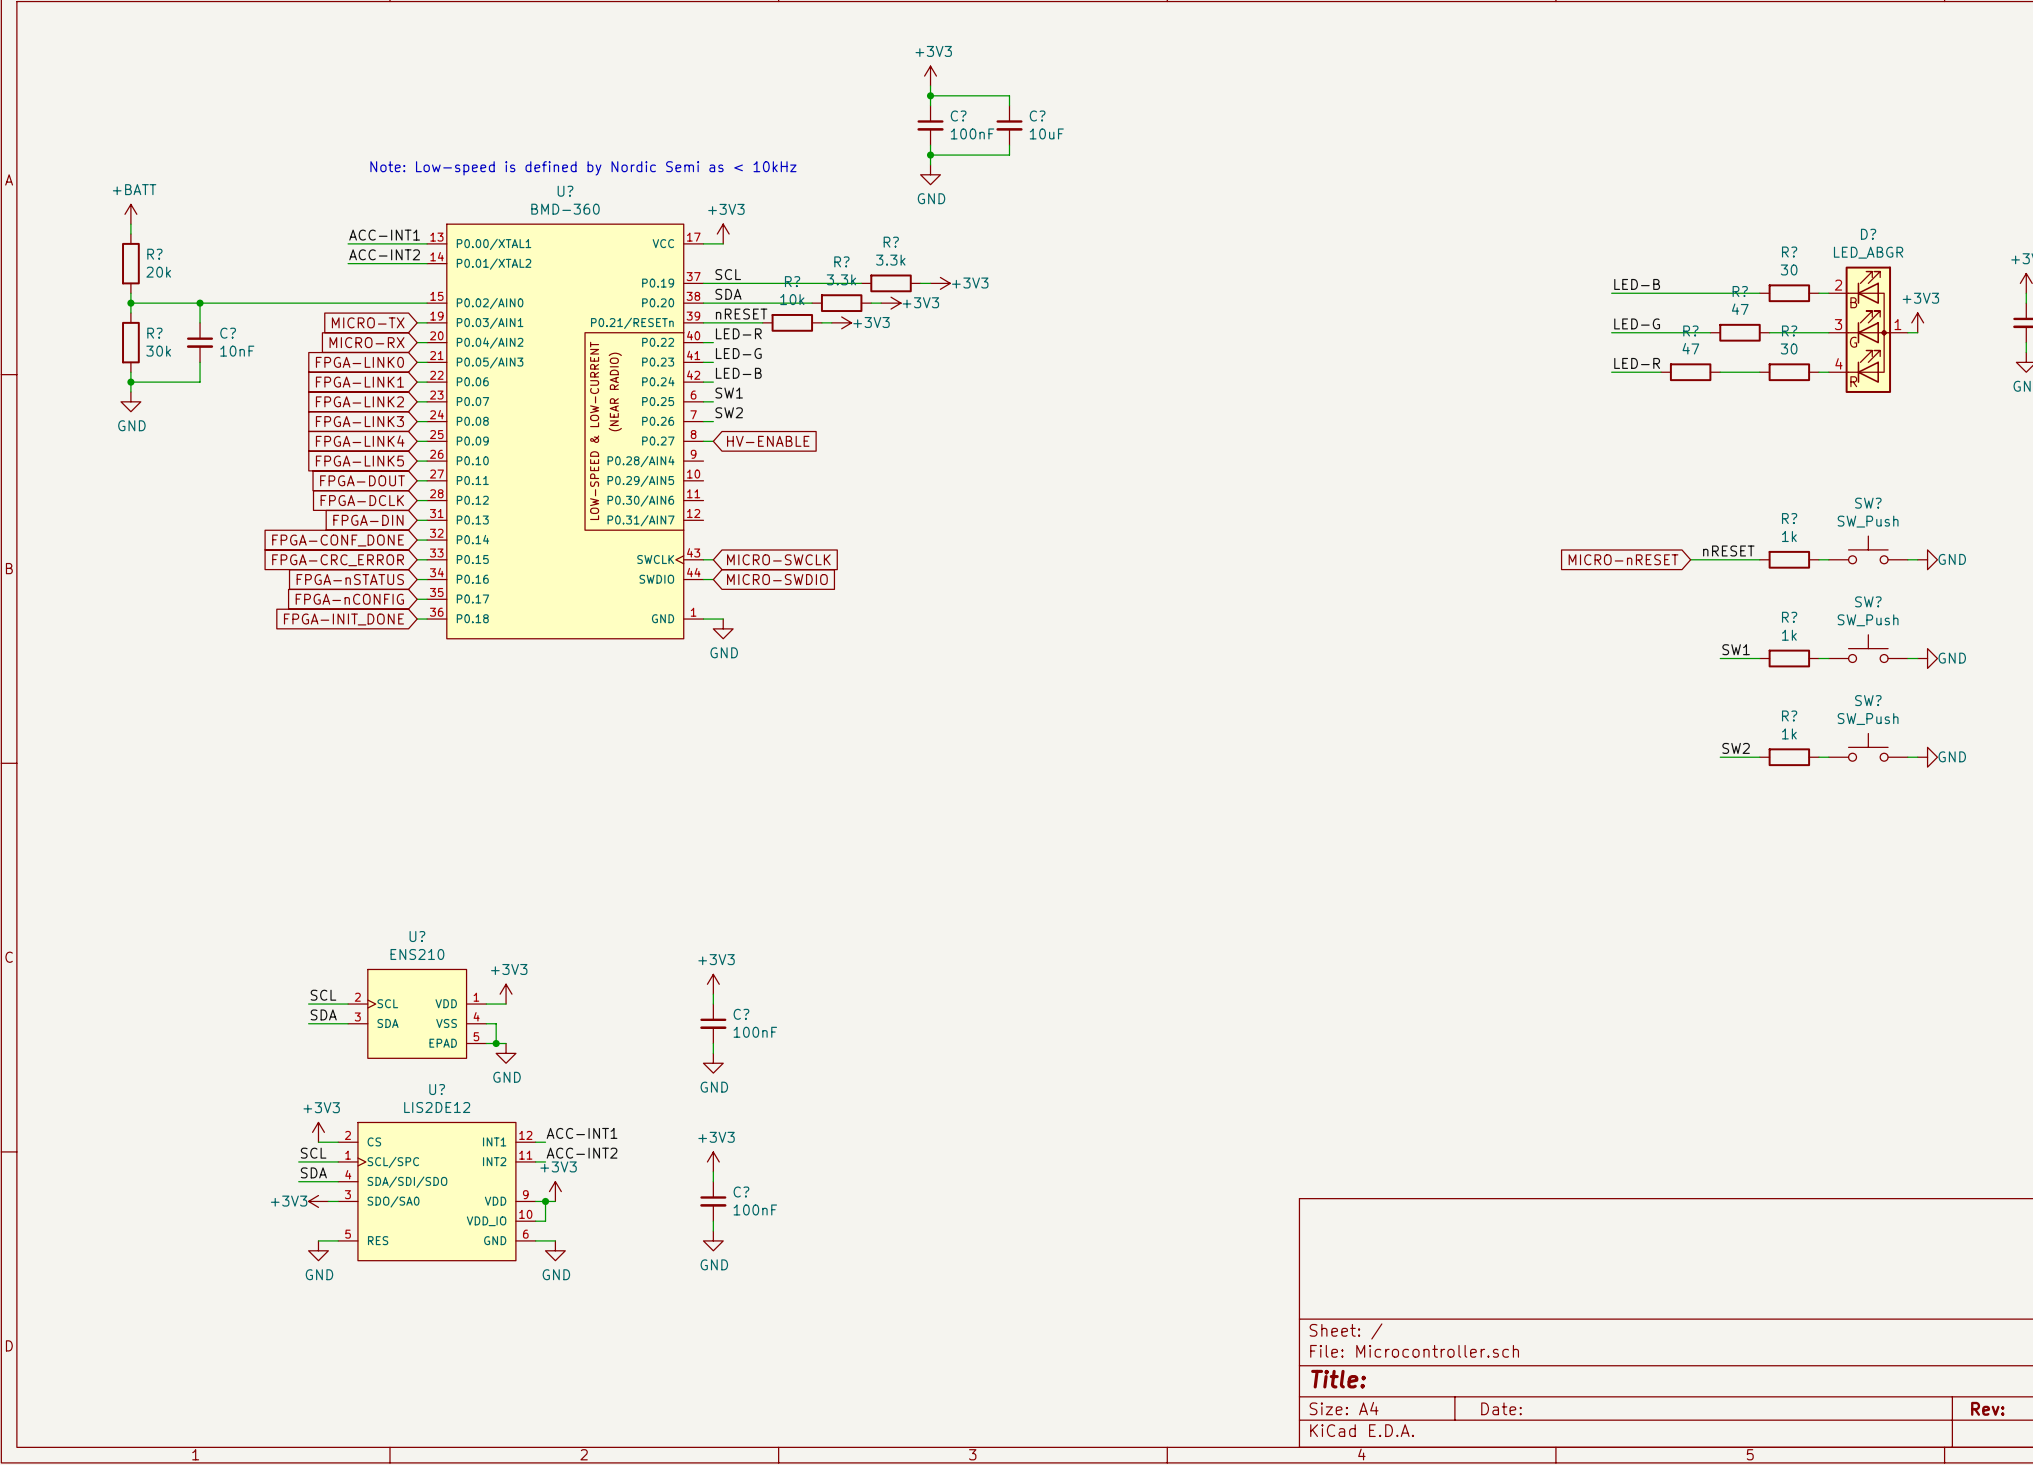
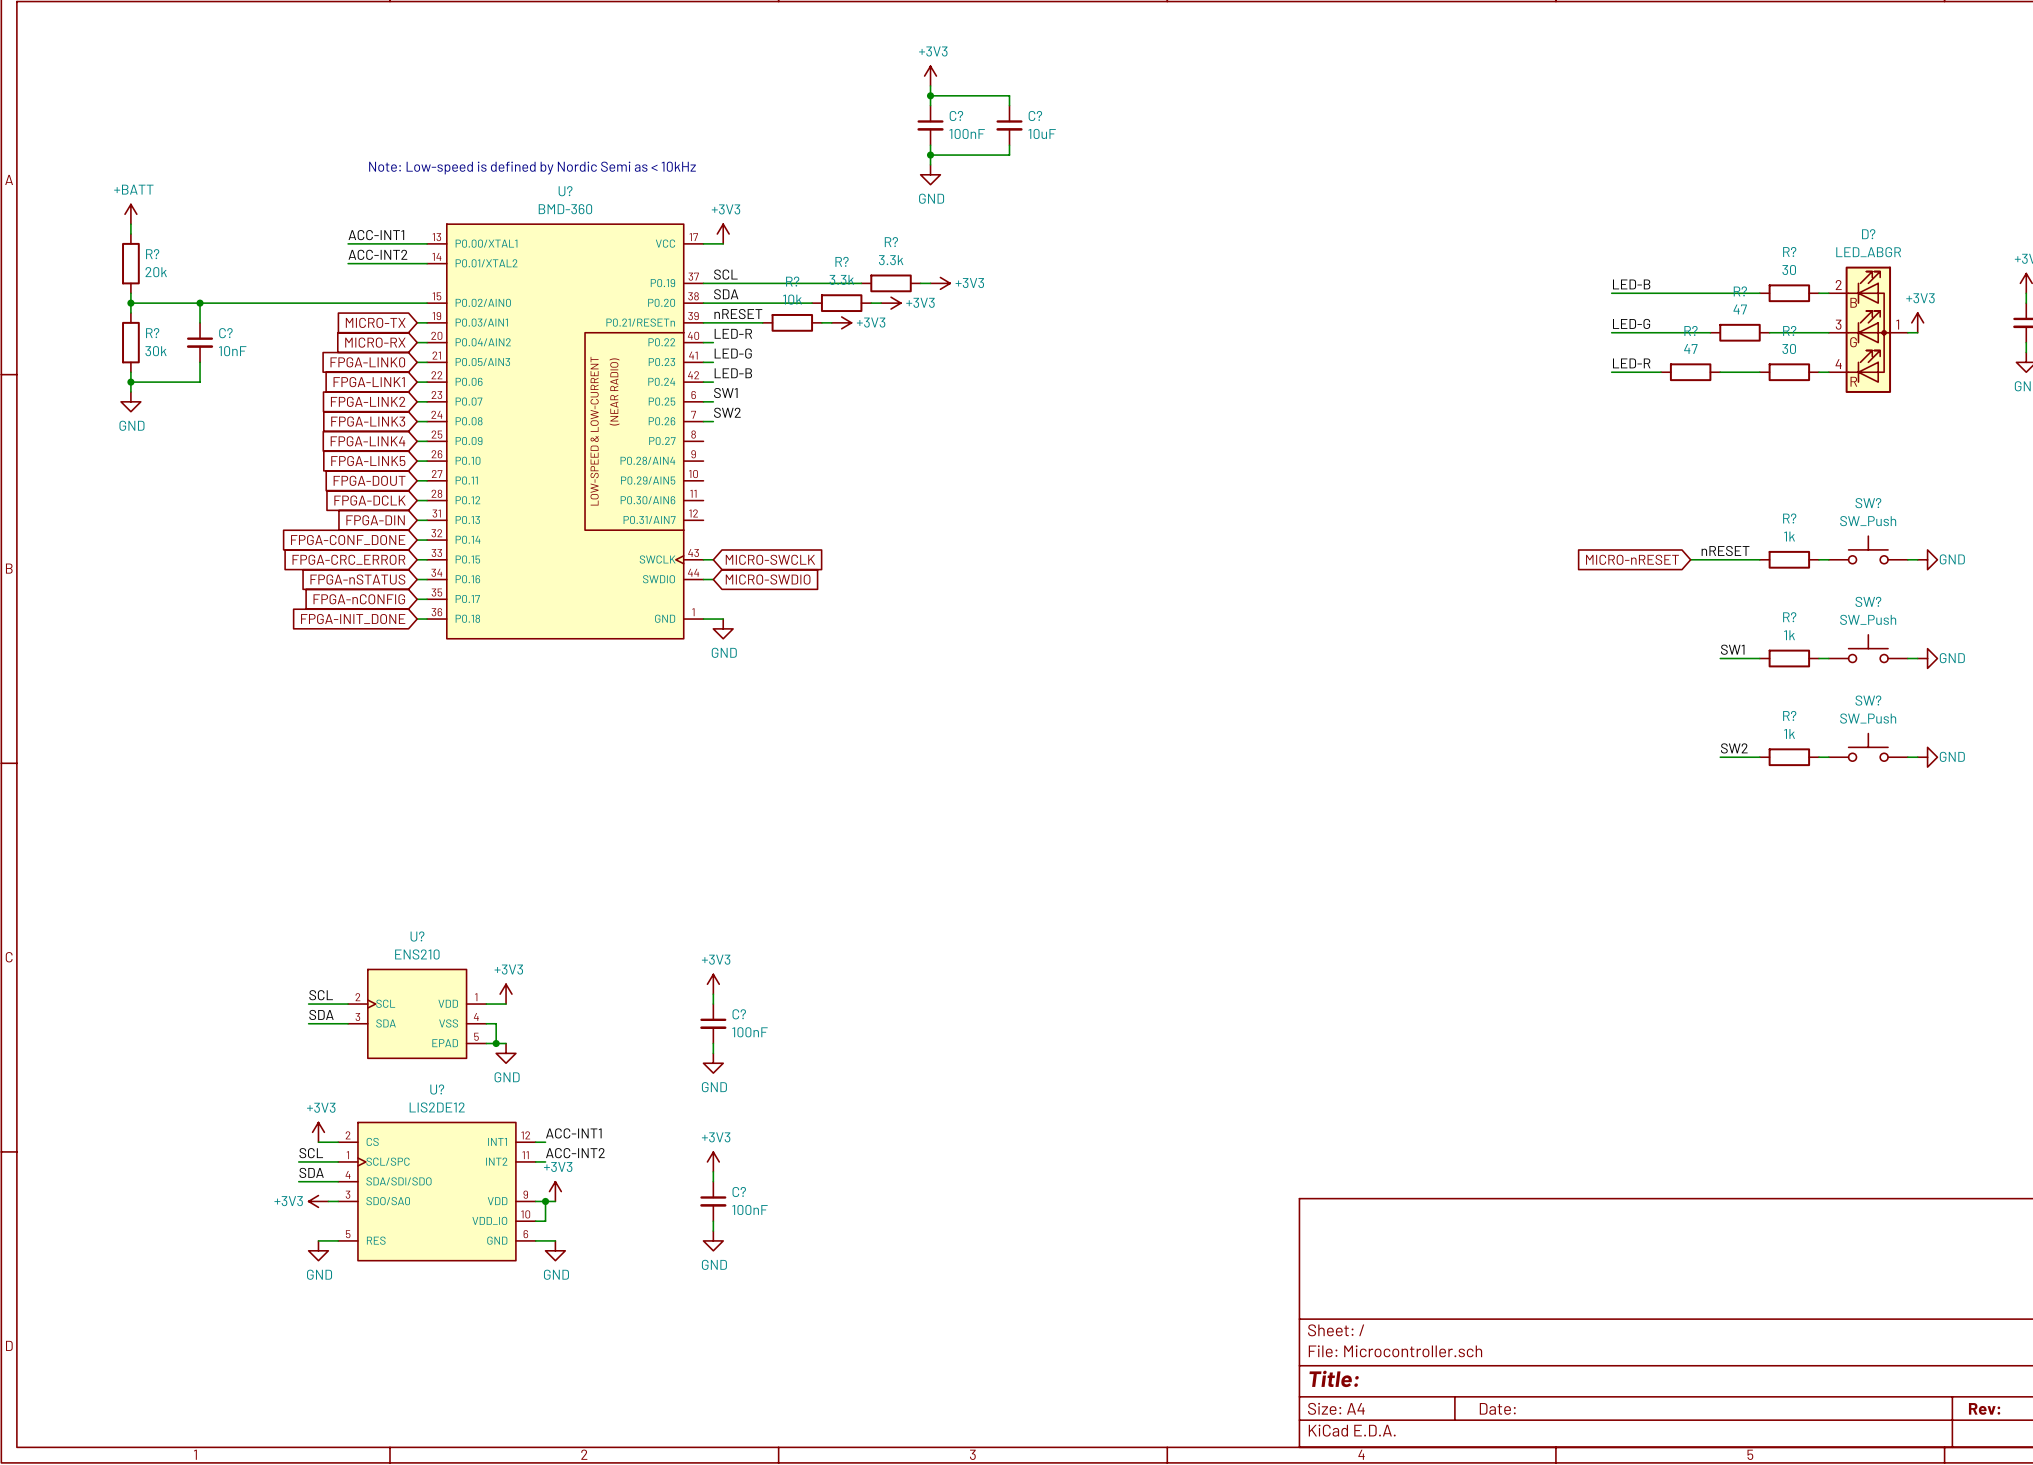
wire: (703, 441) (713, 441) -> none
global label: HV-ENABLE (768, 441) -> none

